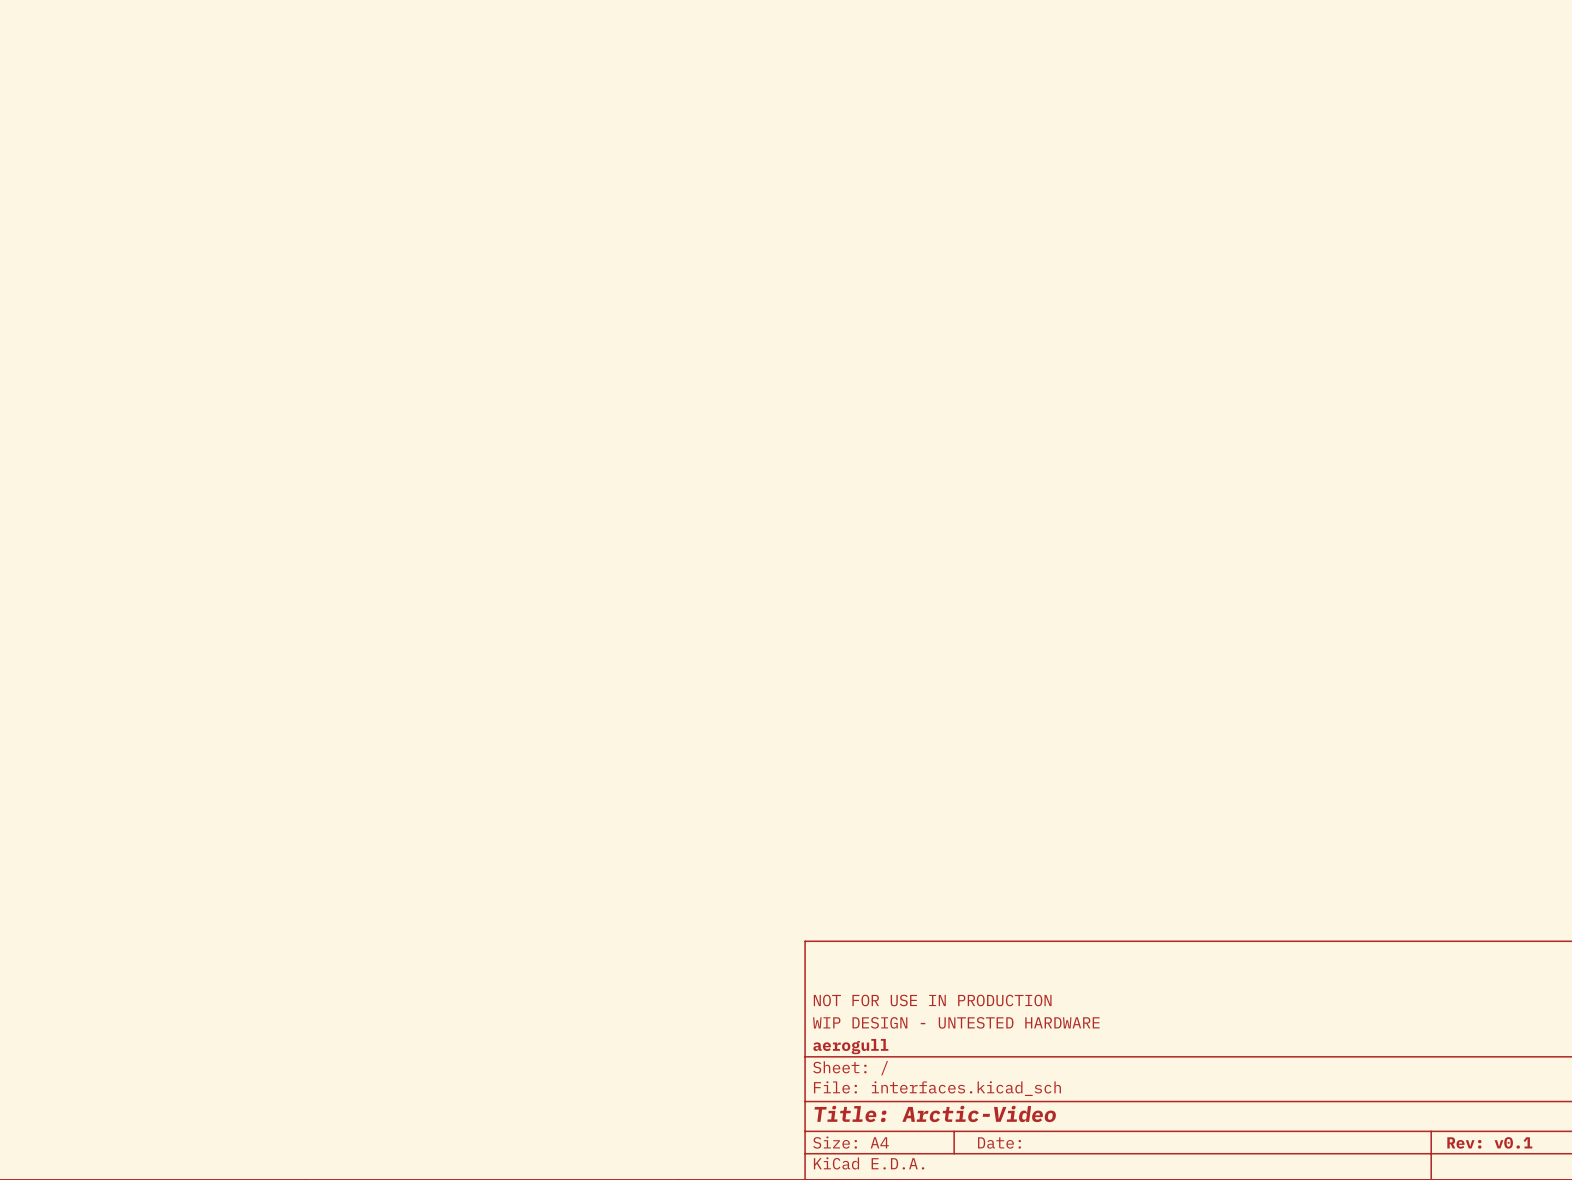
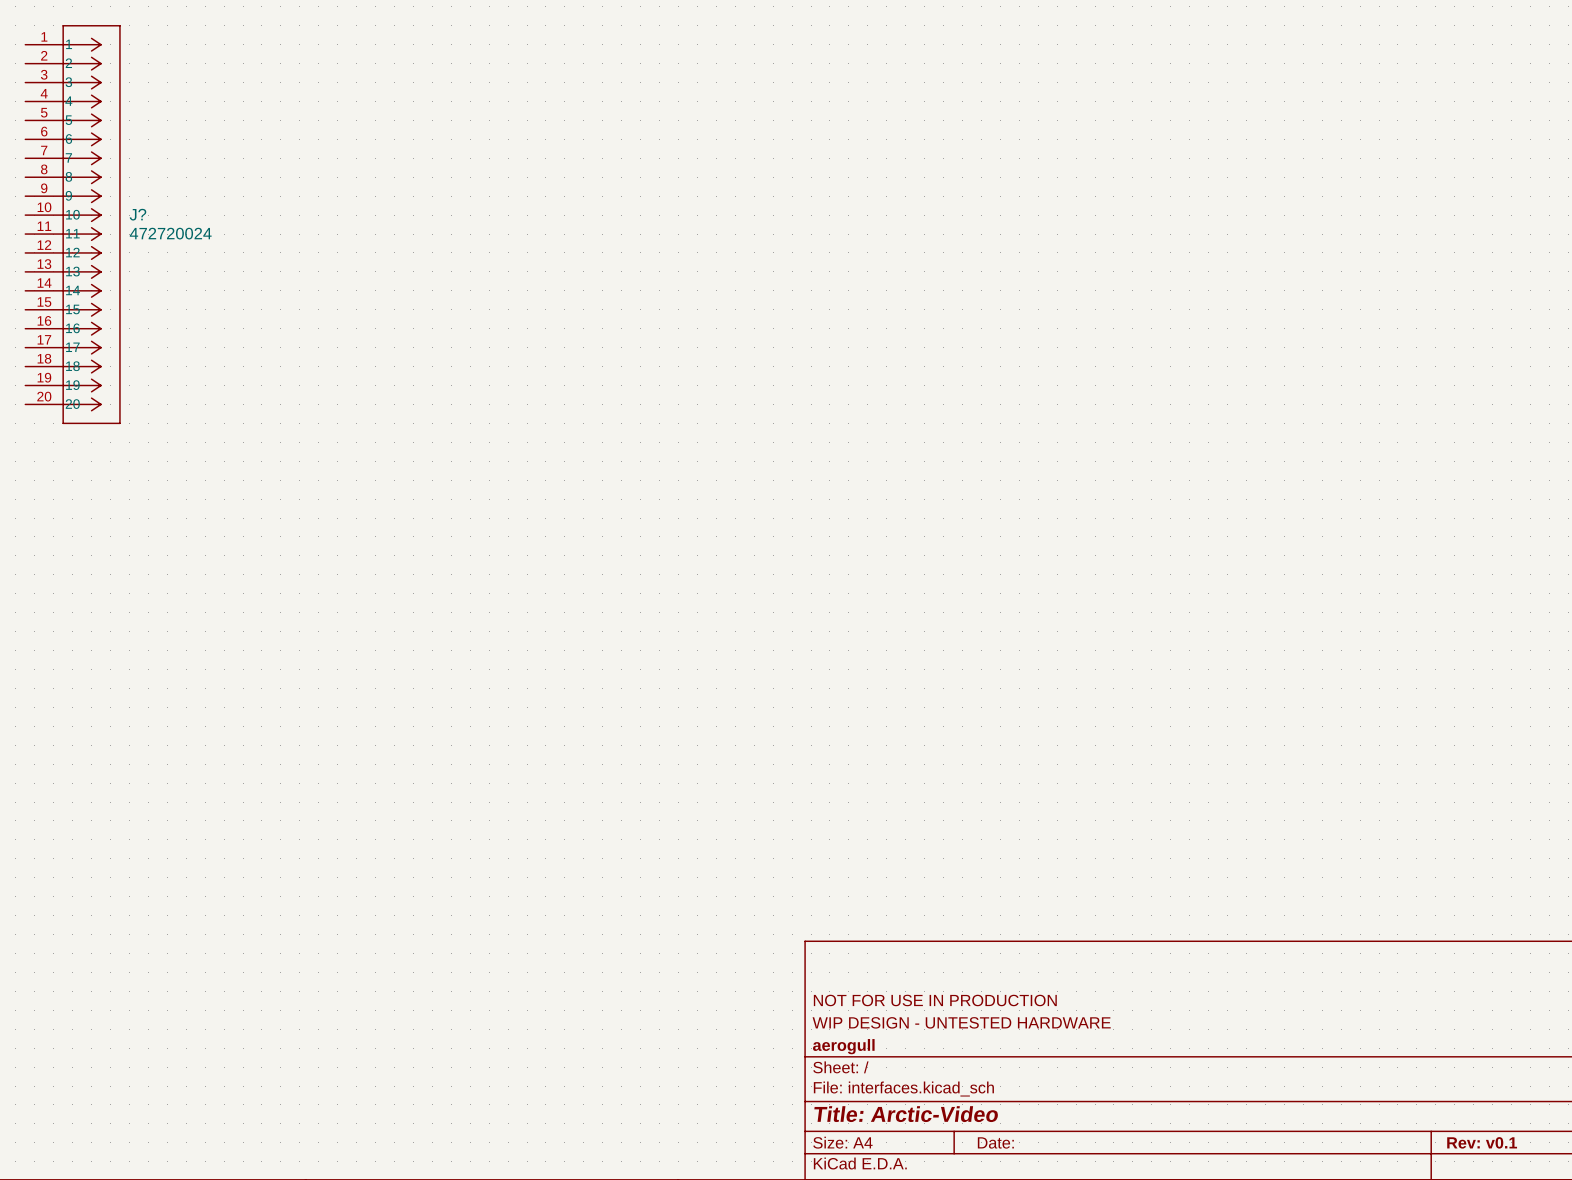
J?: none -> 472720024 (72, 224)

